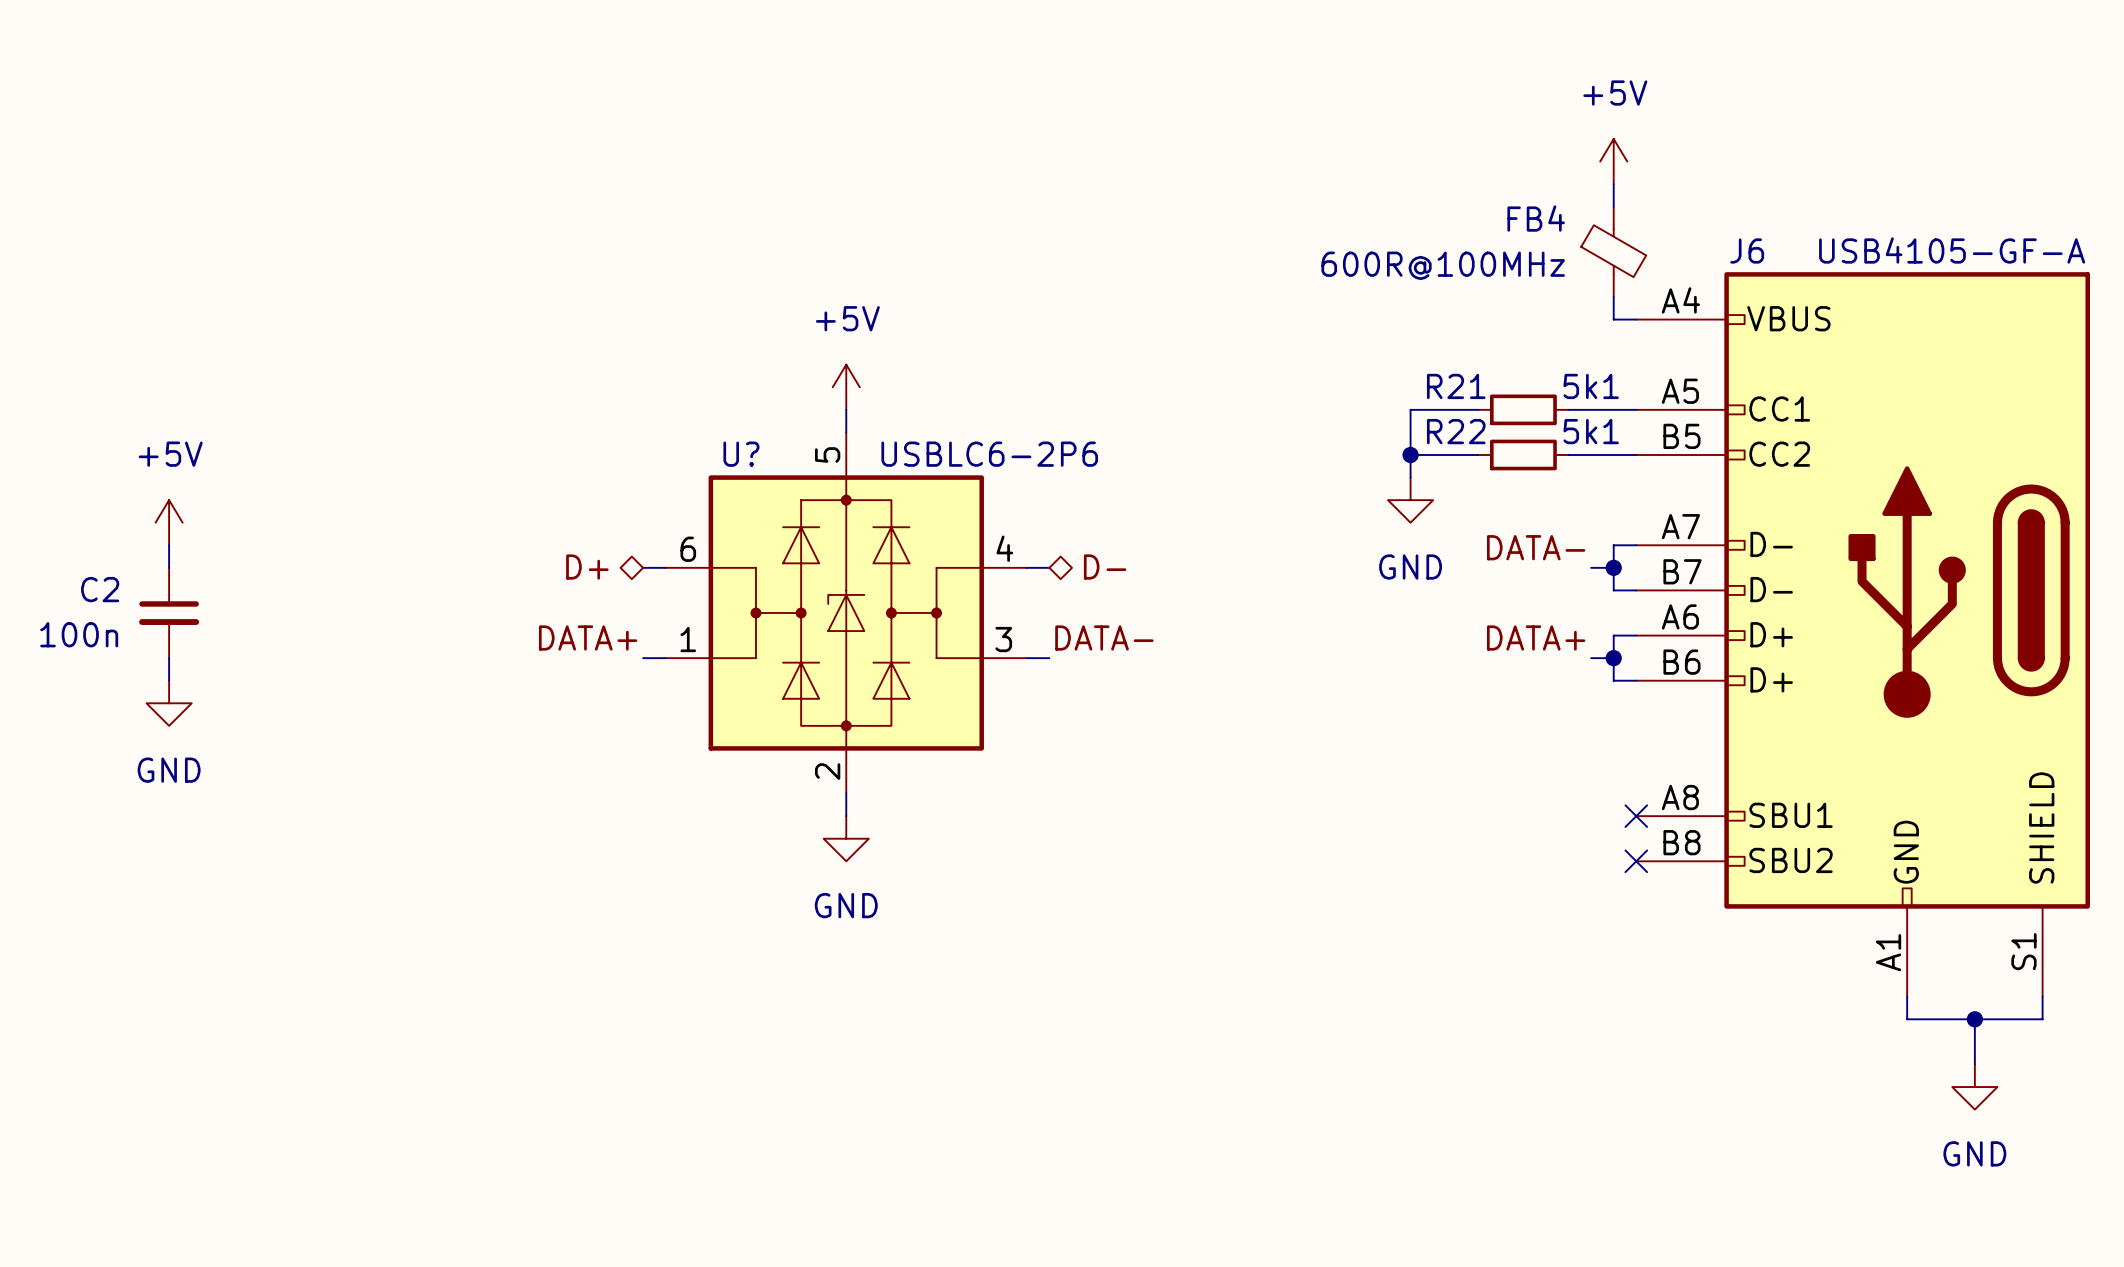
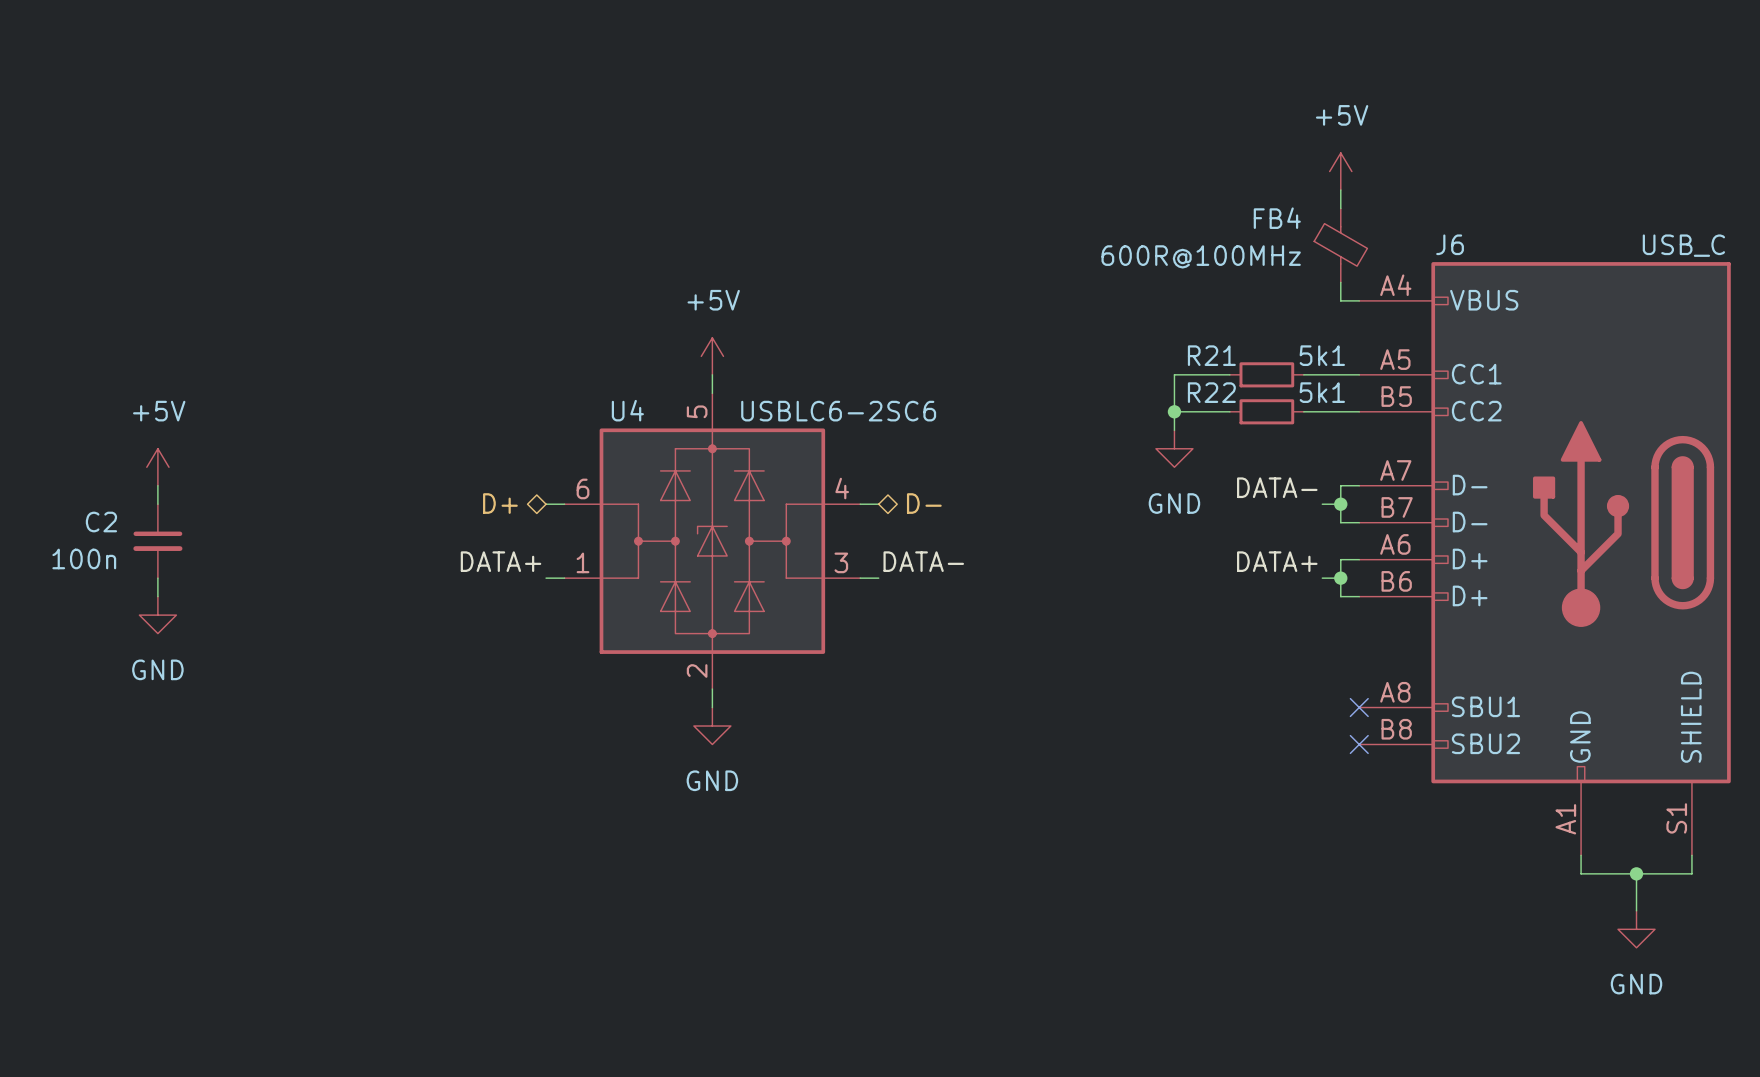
J6 value: USB4105-GF-A (1952, 250) -> USB_C (1683, 245)
U? name: U? (741, 454) -> U4 (627, 410)
U? value: USBLC6-2P6 (989, 454) -> USBLC6-2SC6 (838, 411)

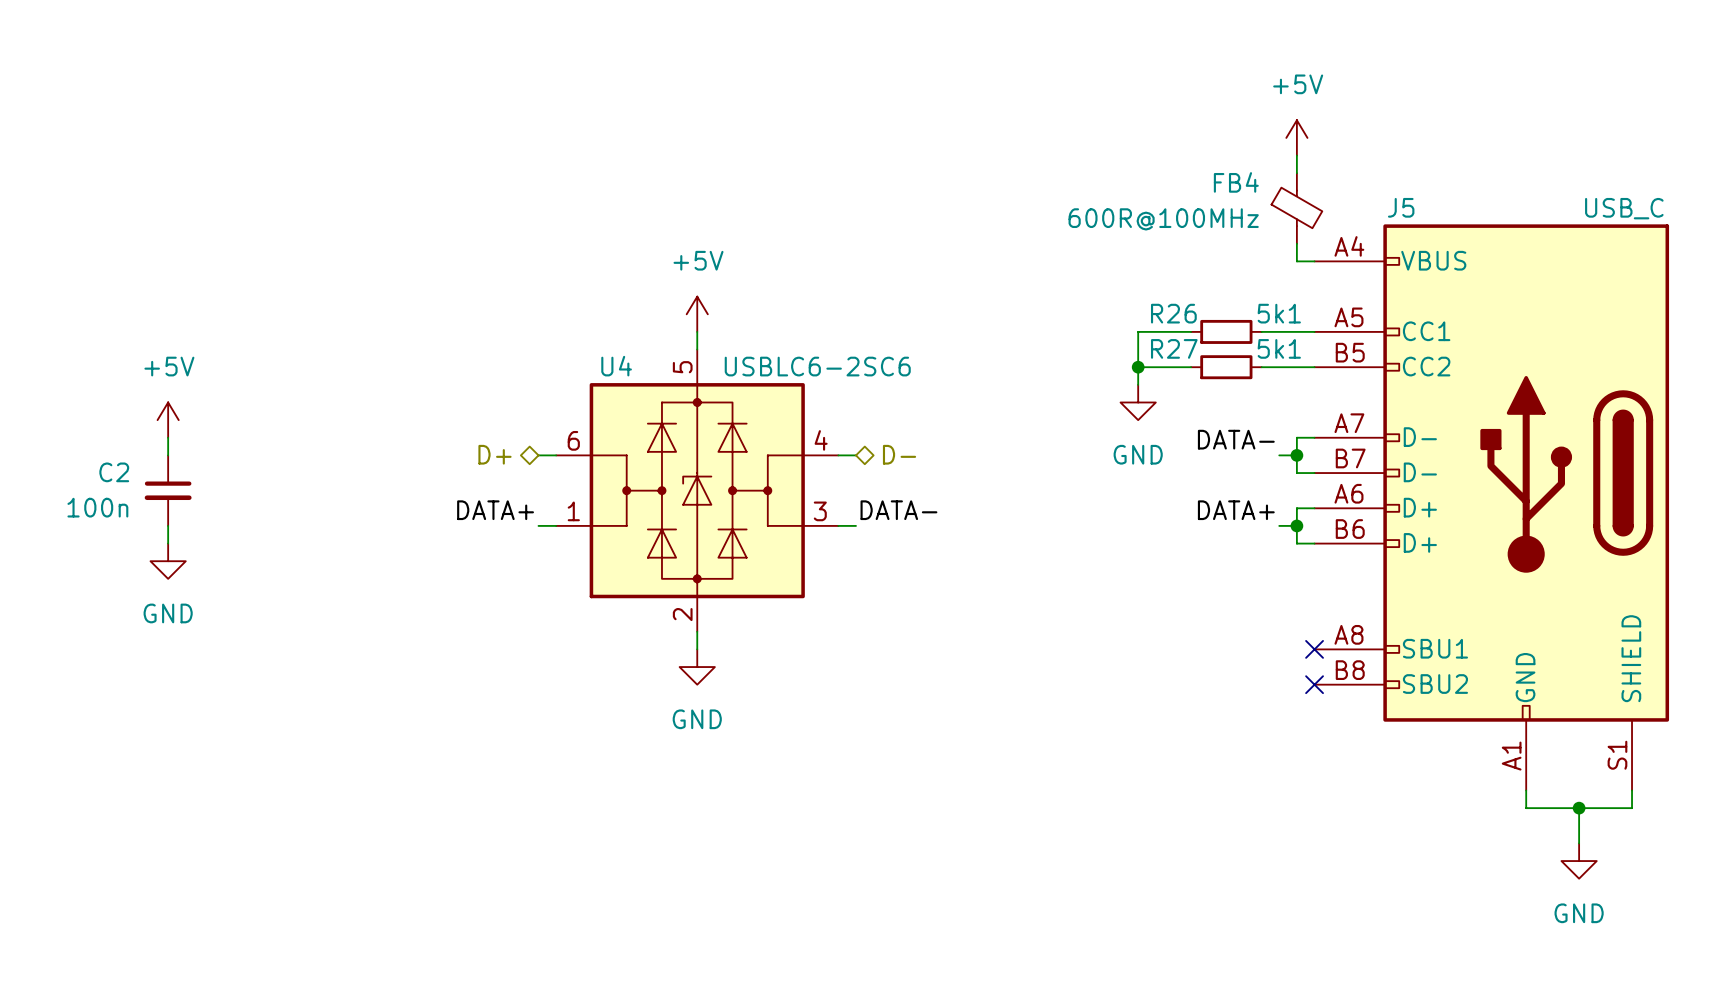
J6 name: J6 (1450, 244) -> J5 (1401, 207)
R21 name: R21 (1211, 355) -> R26 (1173, 313)
R22 name: R22 (1211, 392) -> R27 (1174, 348)

